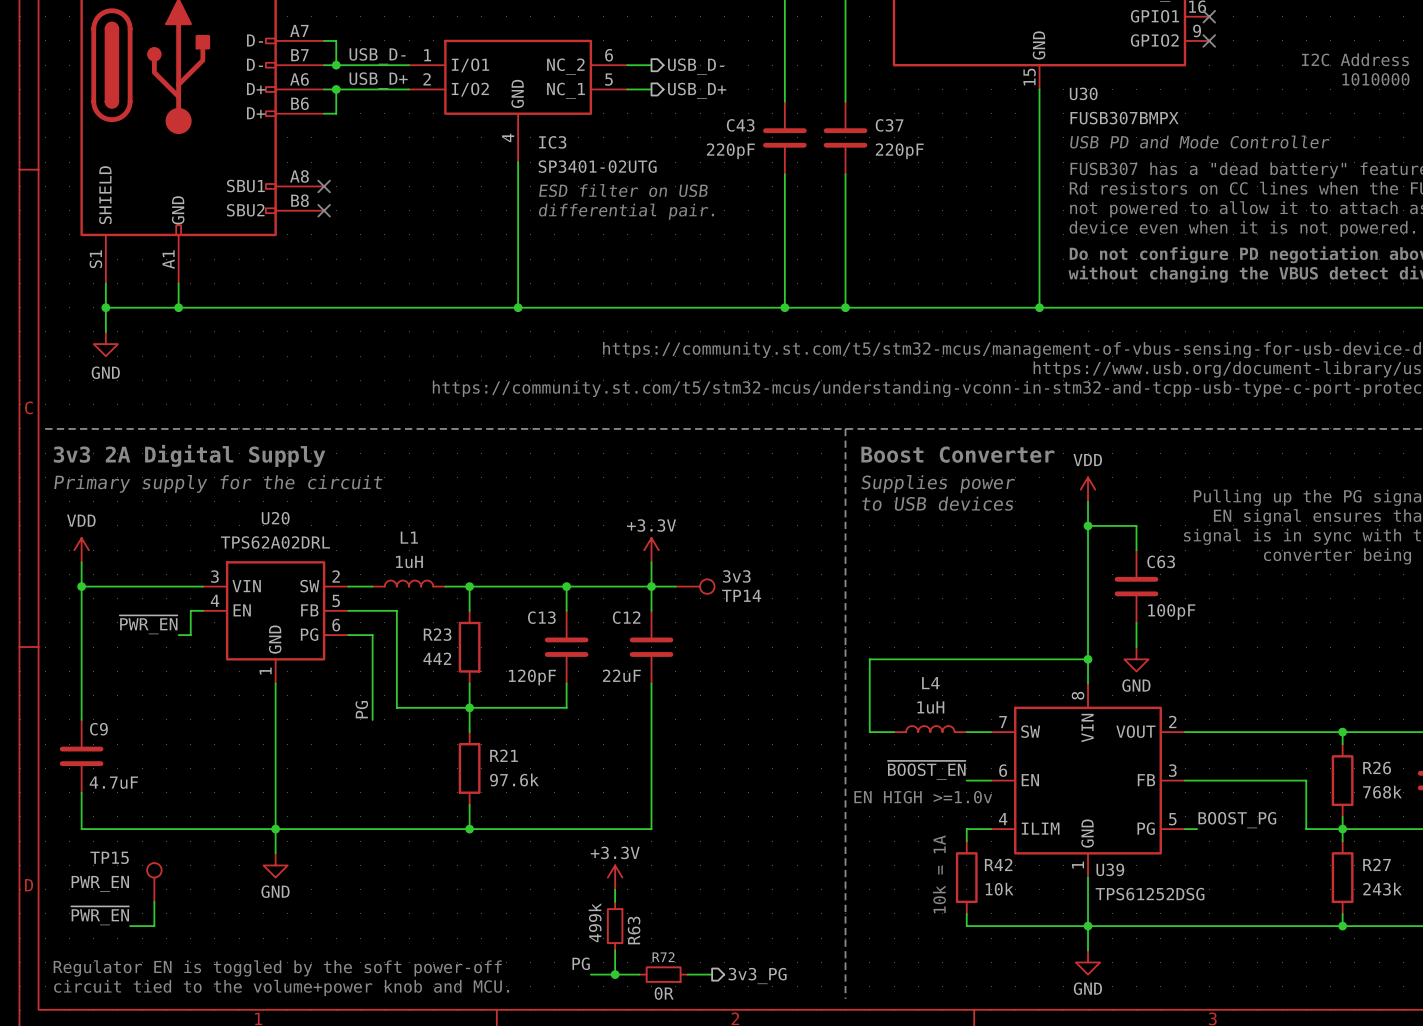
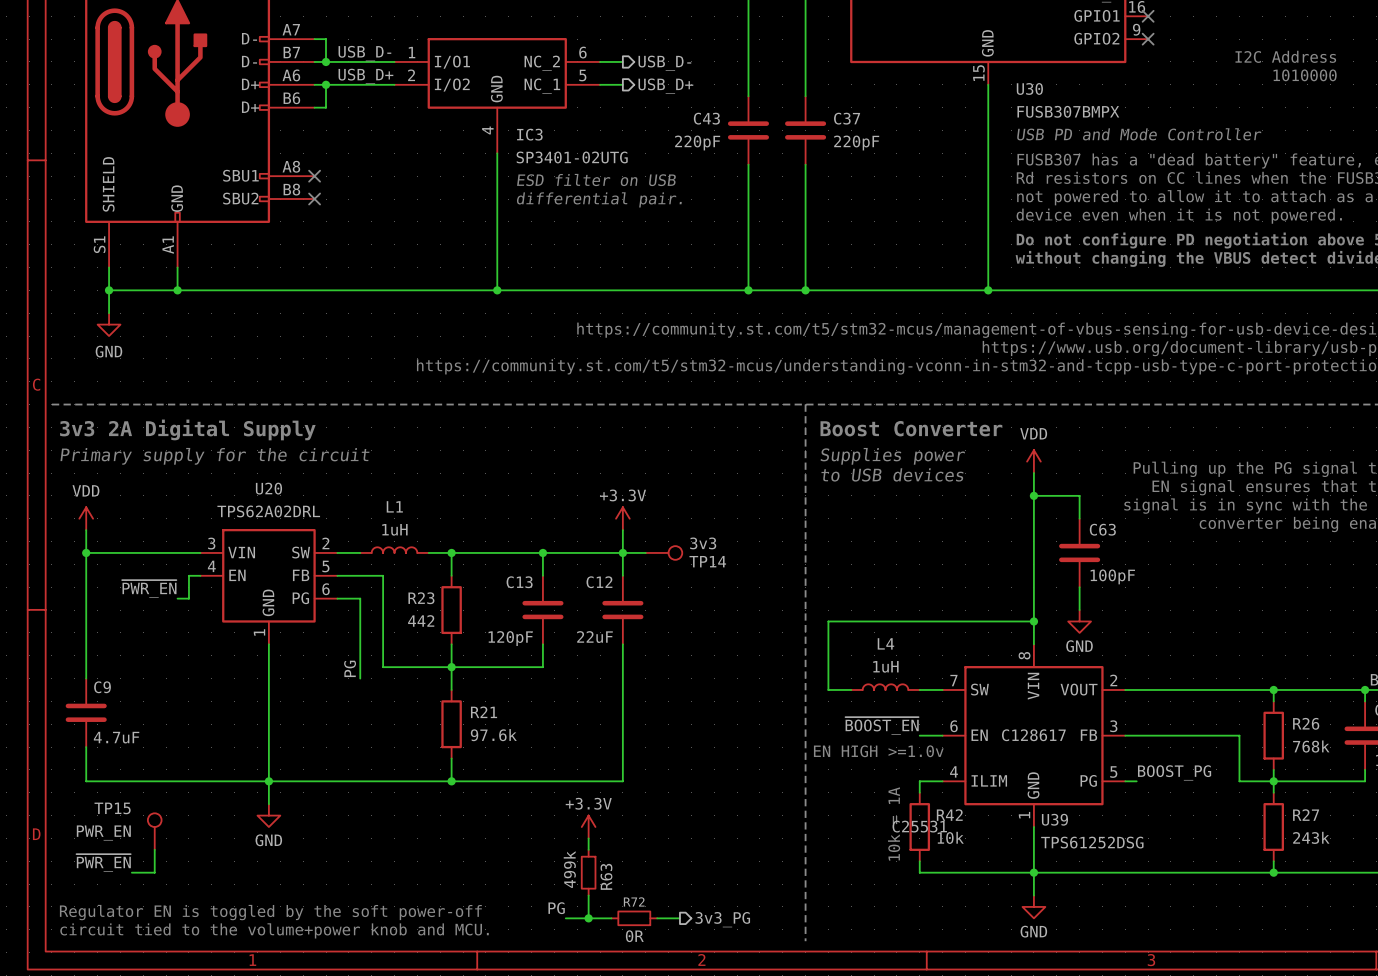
U39 text: none -> C128617 (1033, 735)
R42 text: none -> C25531 (919, 826)

